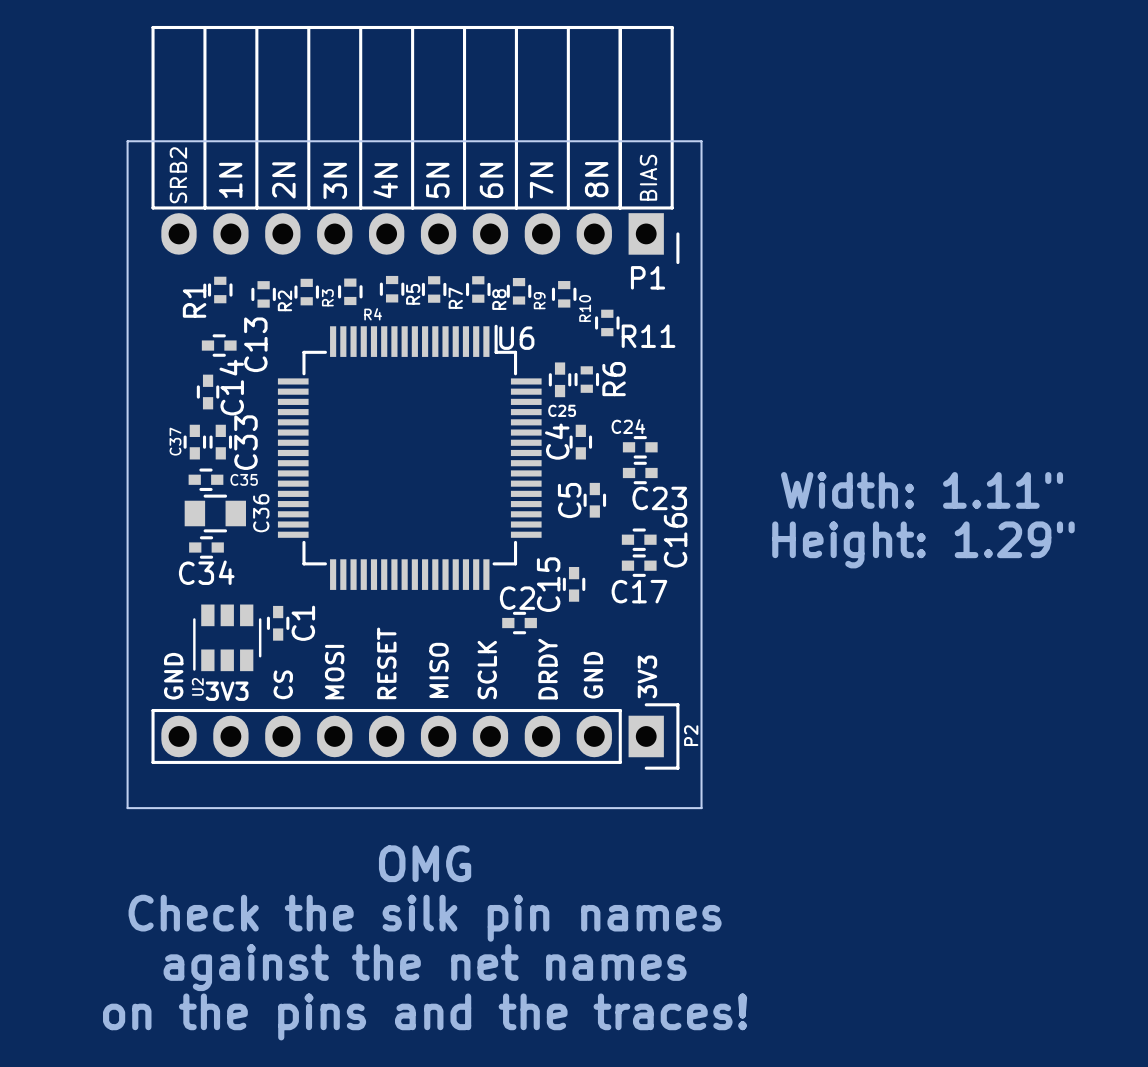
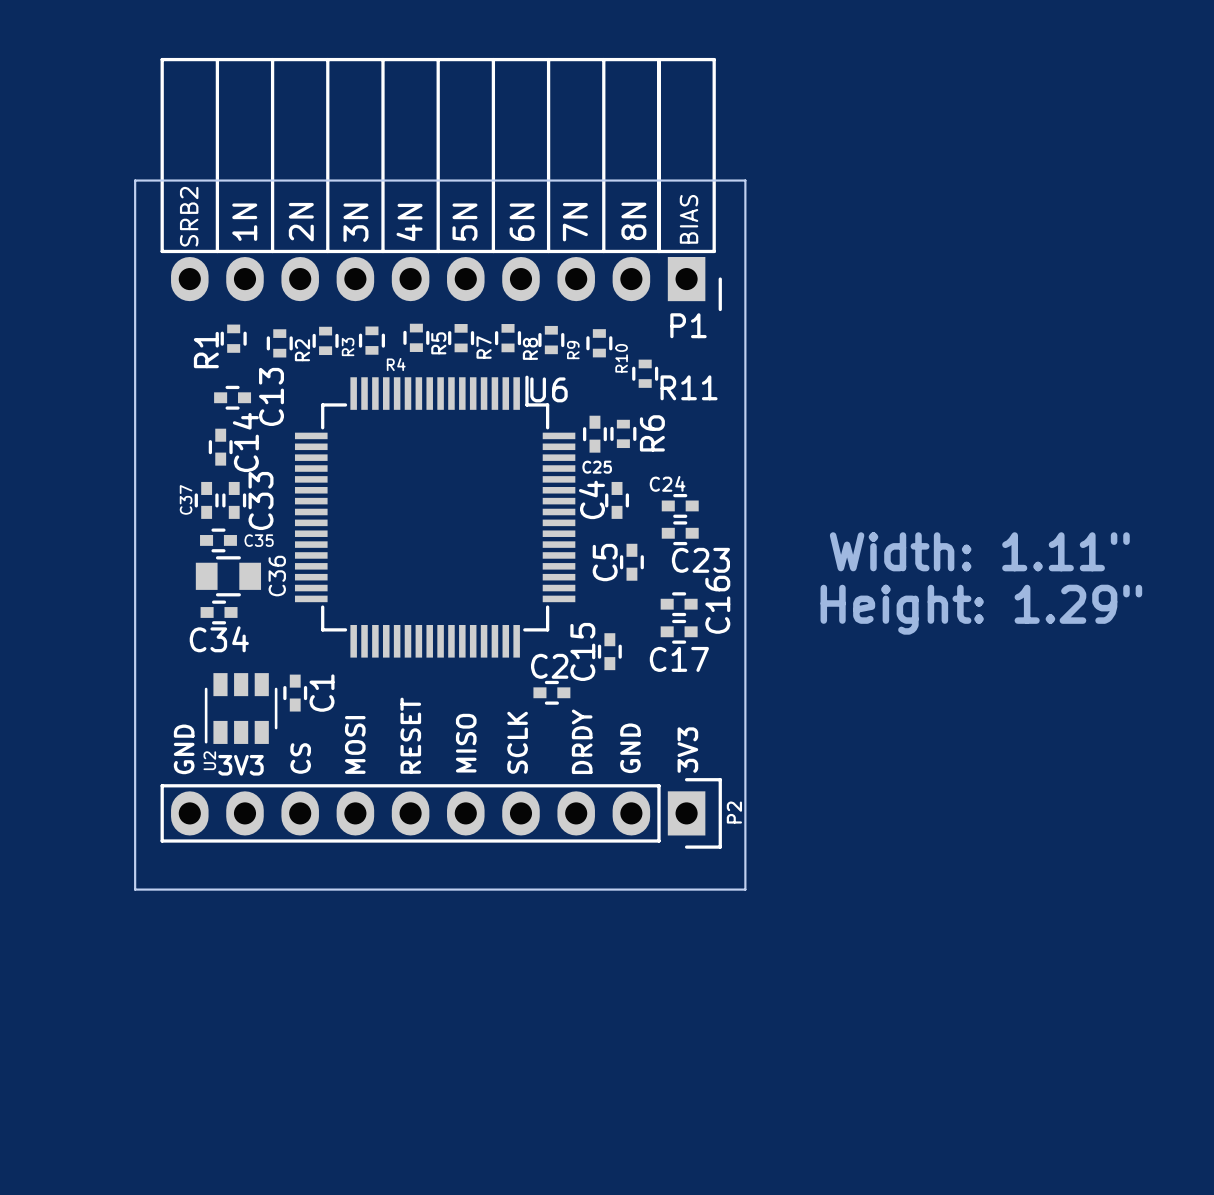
text: OMG (425, 863) -> none
text: Check the silk pin names (425, 918) -> none
text: against the net names (425, 967) -> none
text: on the pins and the traces! (425, 1016) -> none

